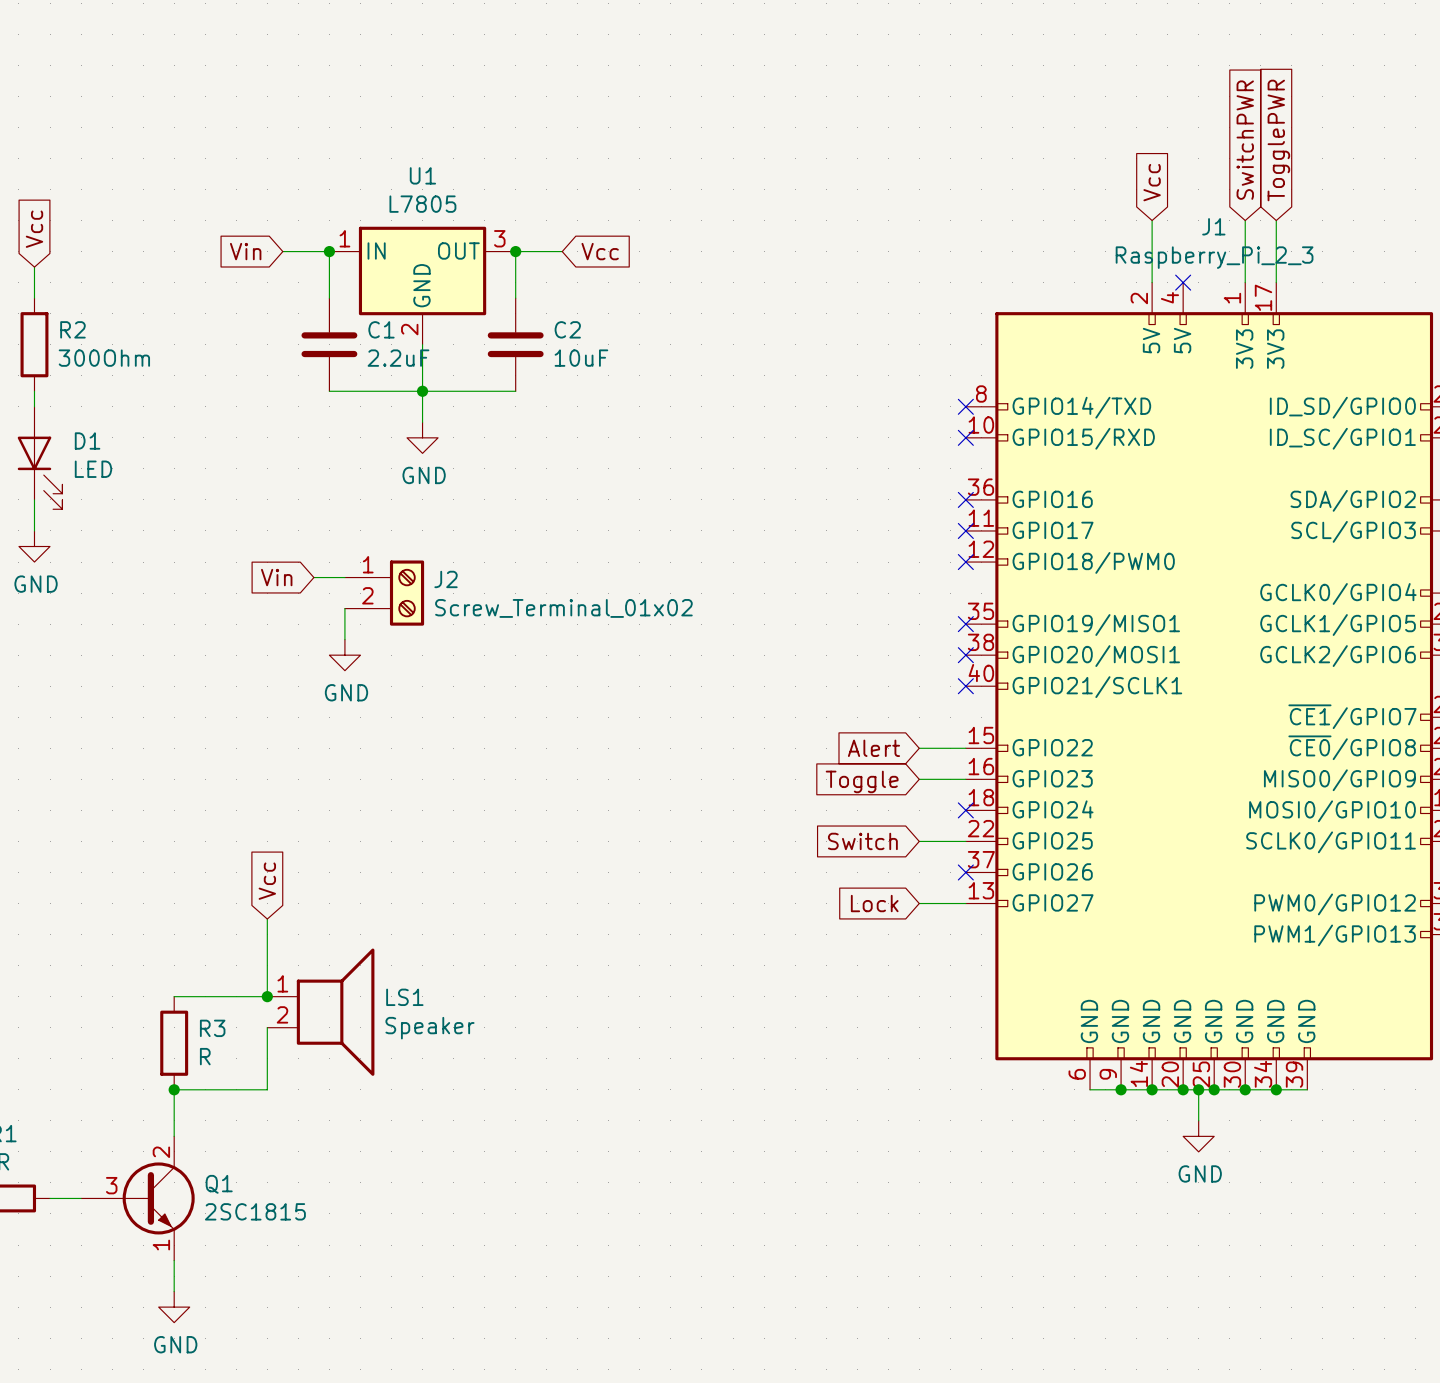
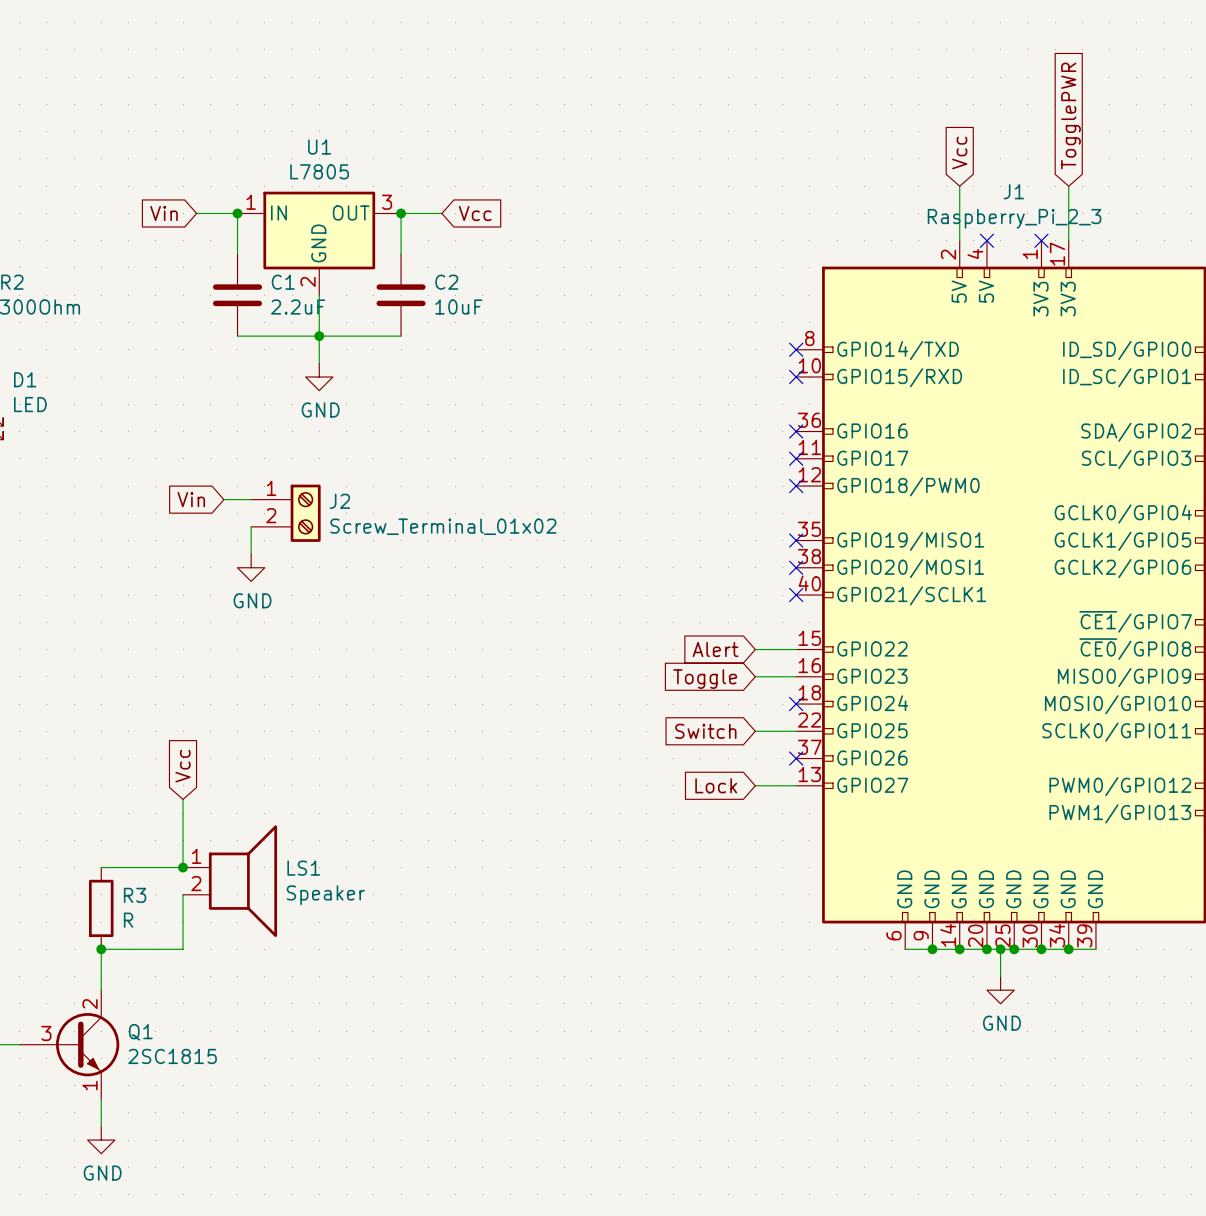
global label: SwitchPWR (1245, 140) -> none
wire: (1245, 220) (1245, 282) -> none
no-connect mark: none -> (1041, 240)

